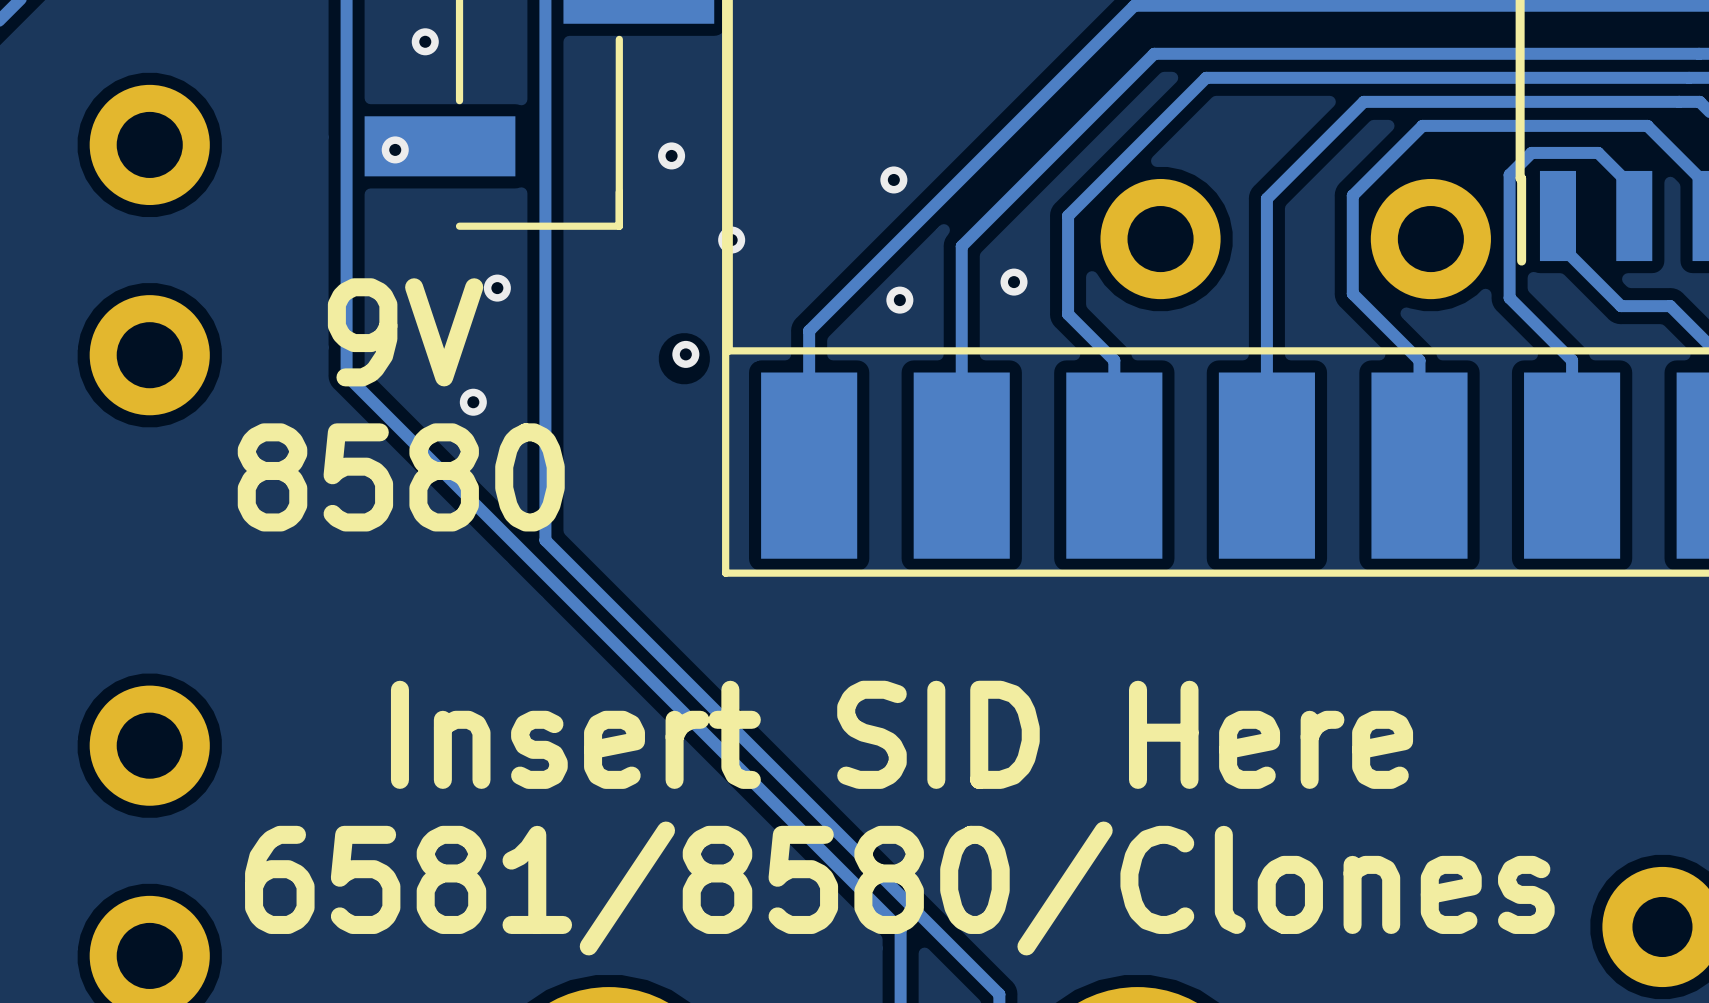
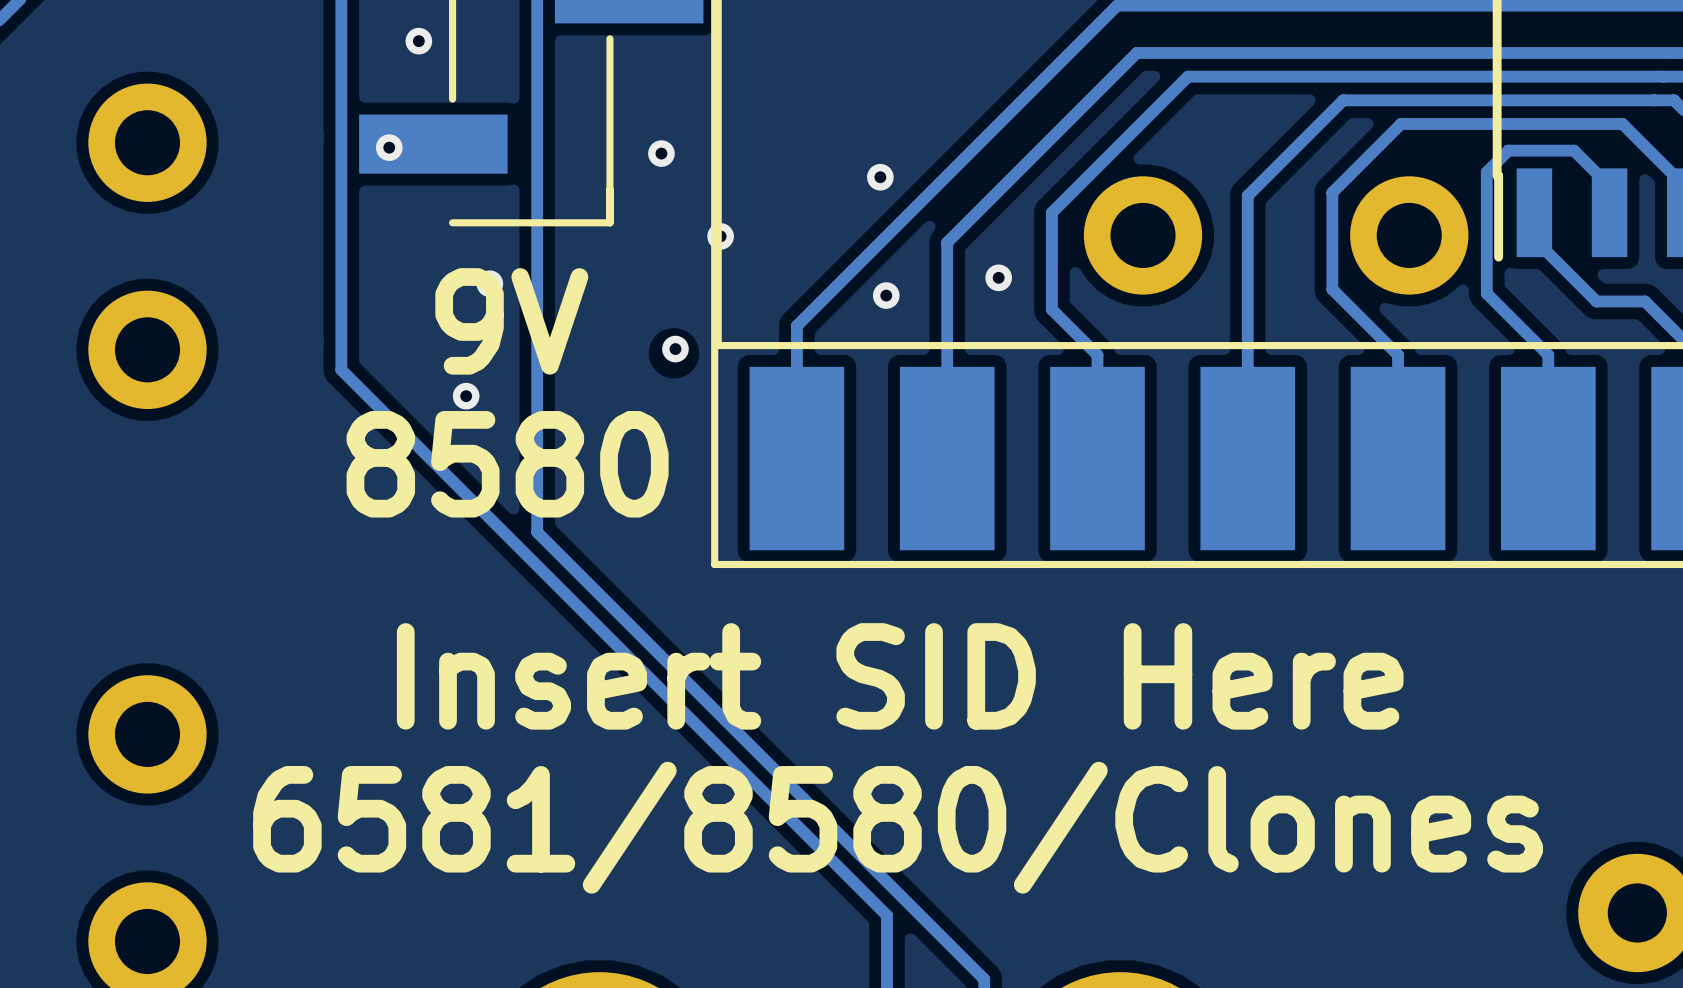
text position: 9V (405, 332) -> 9V (511, 321)
text position: 8580 (401, 477) -> 8580 (507, 464)
text position: Insert SID Here (902, 734) -> Insert SID Here (900, 676)
text position: 6581/8580/Clones (899, 888) -> 6581/8580/Clones (898, 827)

